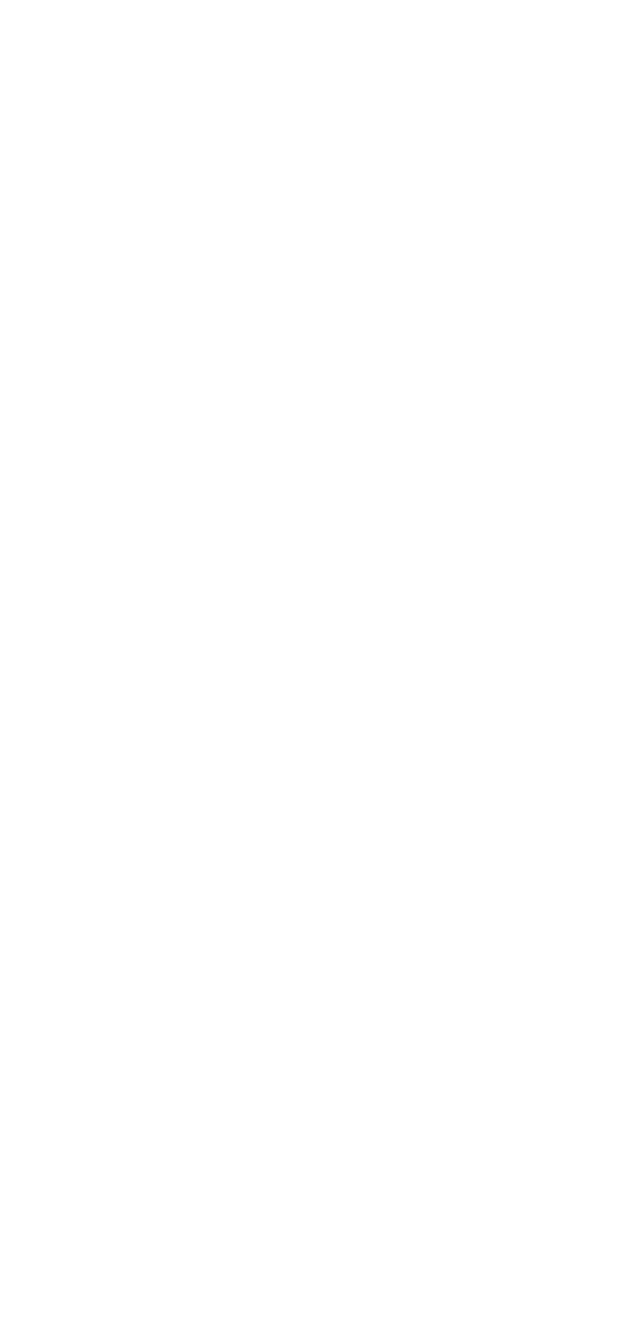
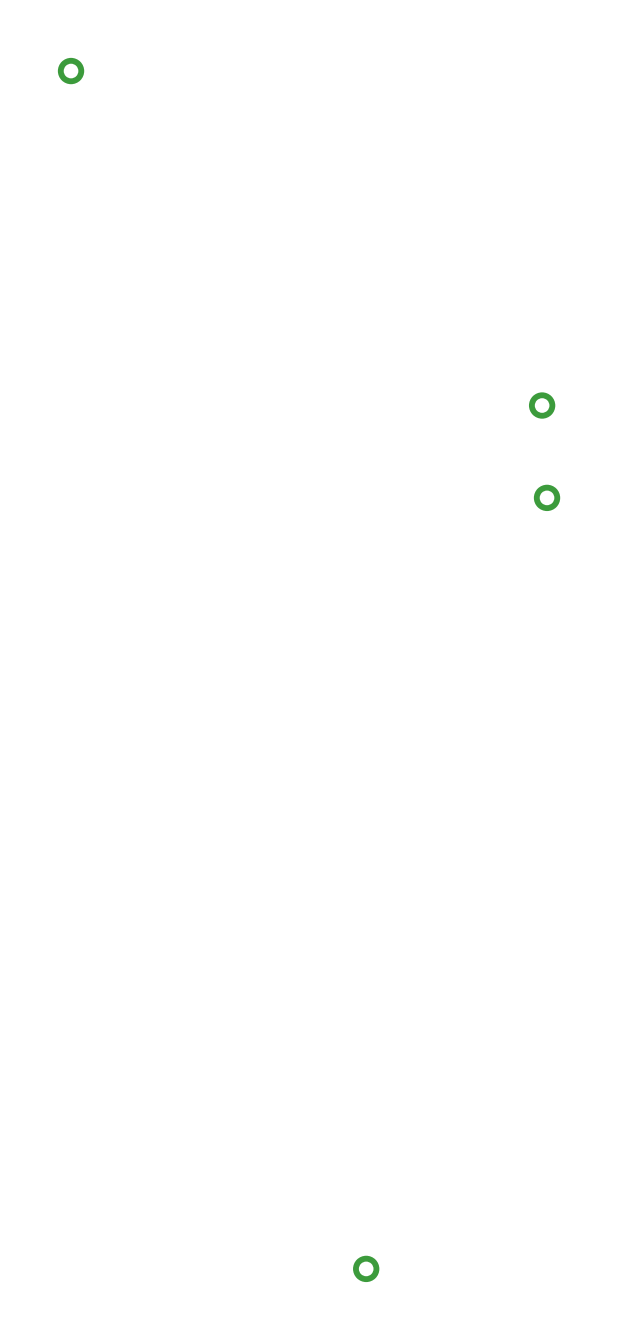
part: none -> (71, 71)
part: none -> (542, 405)
part: none -> (547, 497)
part: none -> (366, 1268)

